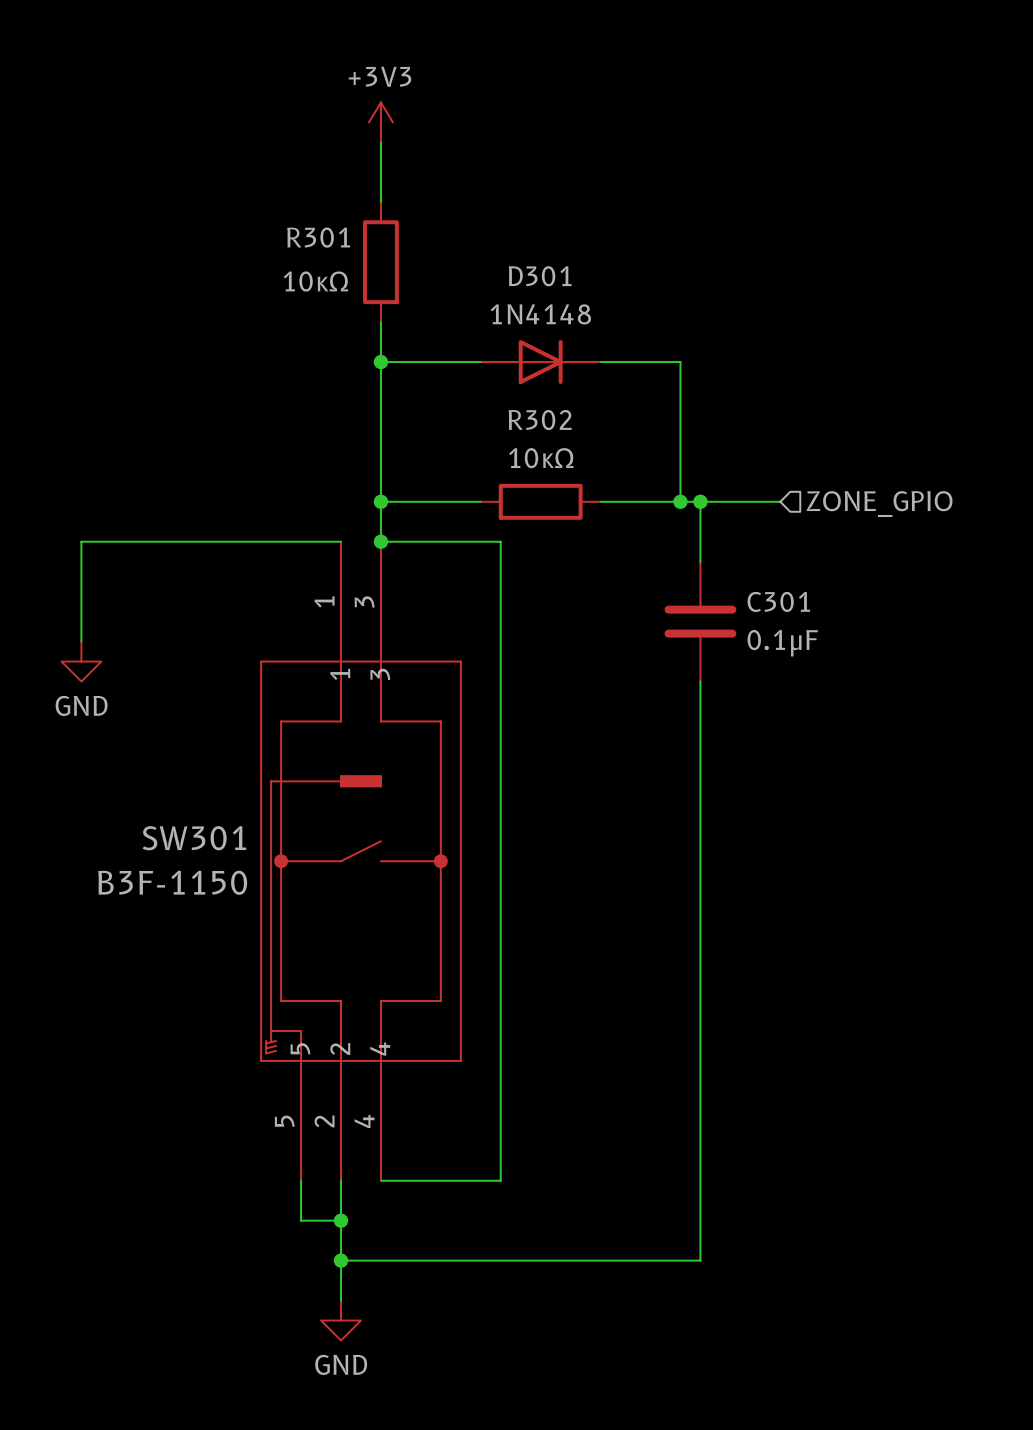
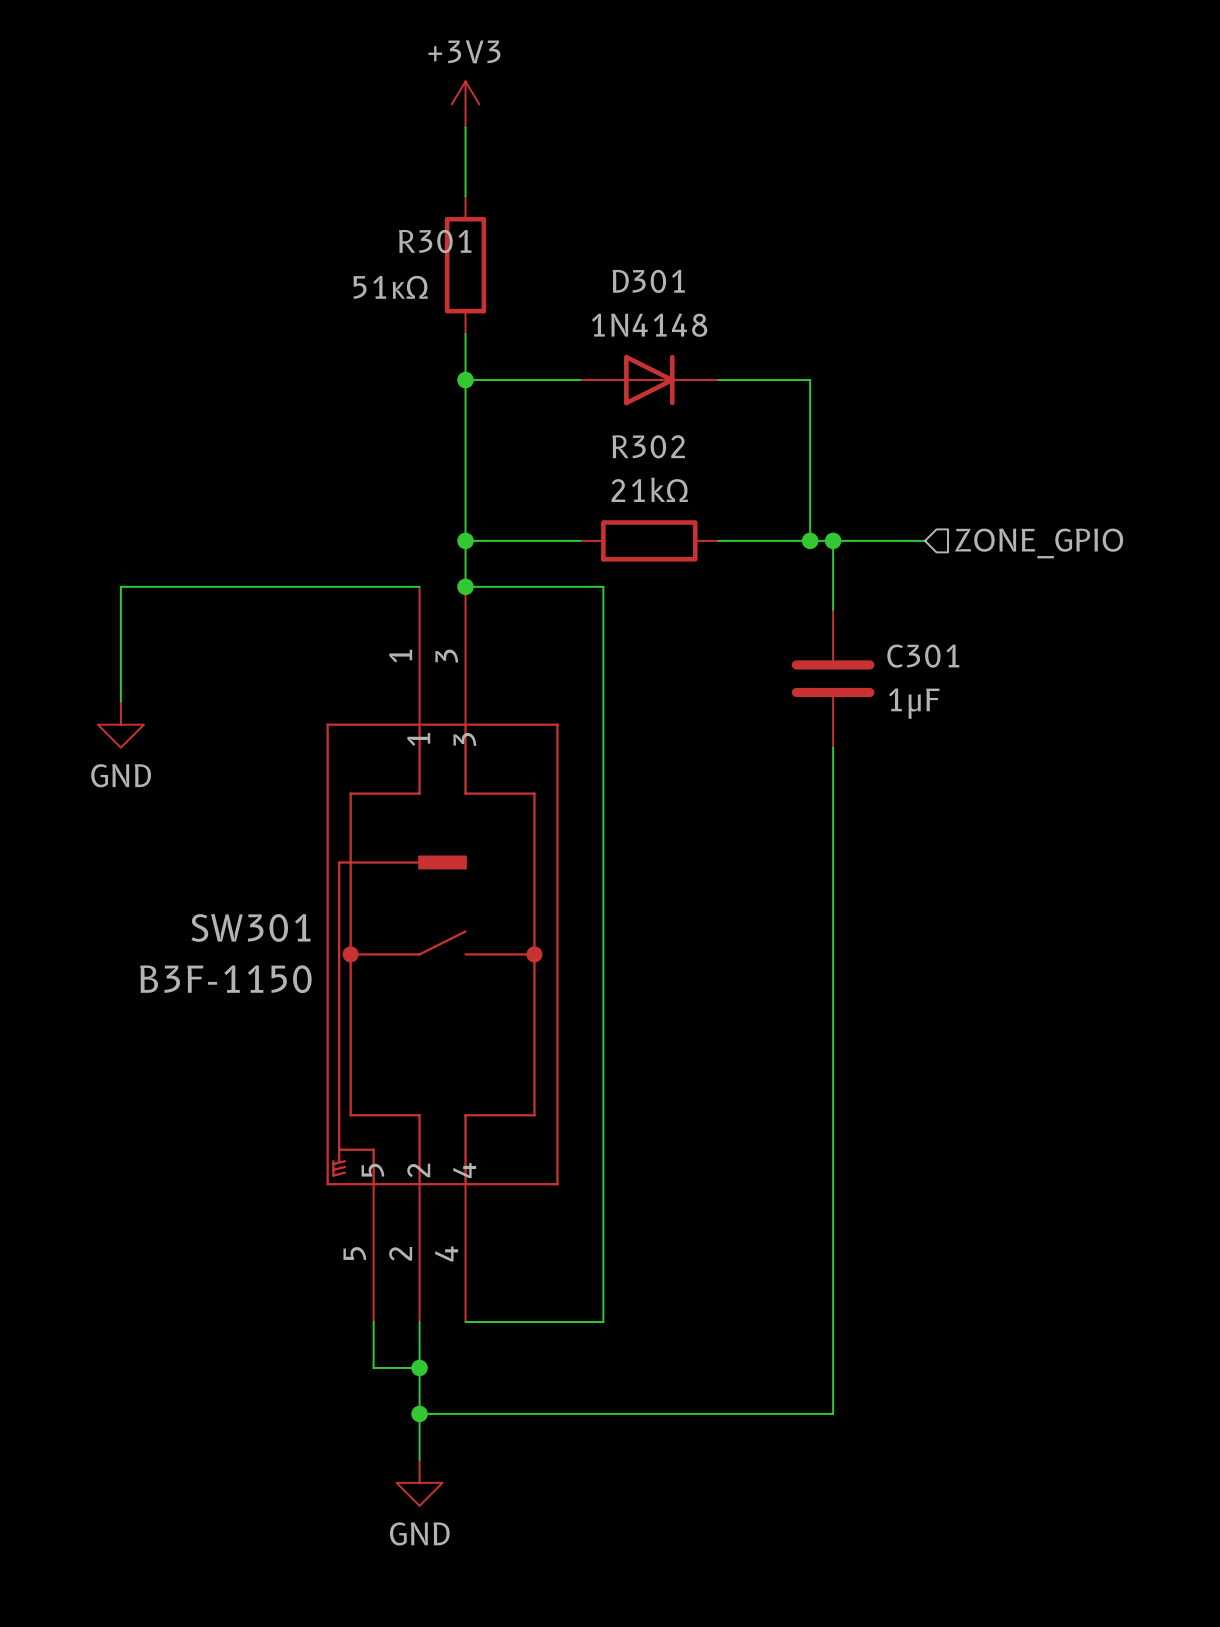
R301 name position: R301 (318, 237) -> R301 (435, 241)
R301 value: 10κΩ (315, 281) -> 51κΩ (390, 287)
R302 value: 10κΩ (541, 458) -> 21kΩ (649, 489)
C301 value: 0.1μF (782, 643) -> 1μF (914, 703)

